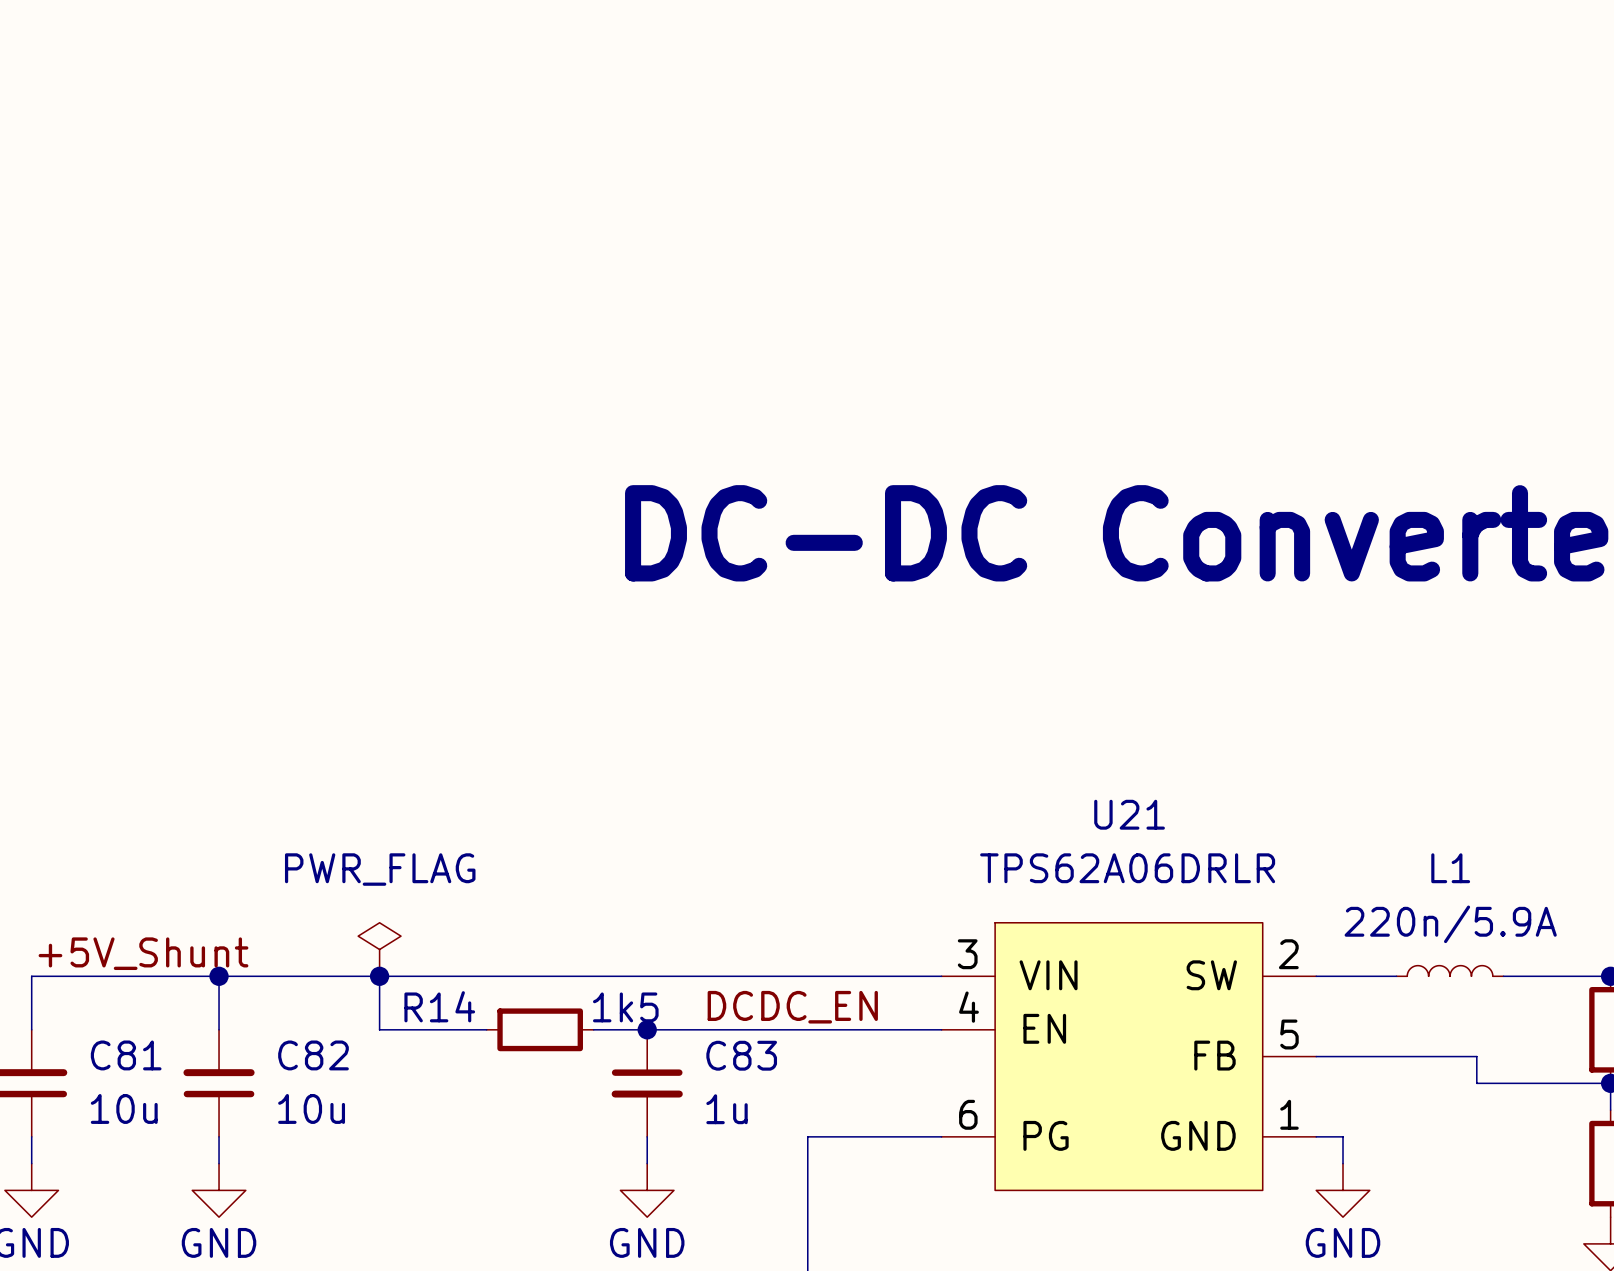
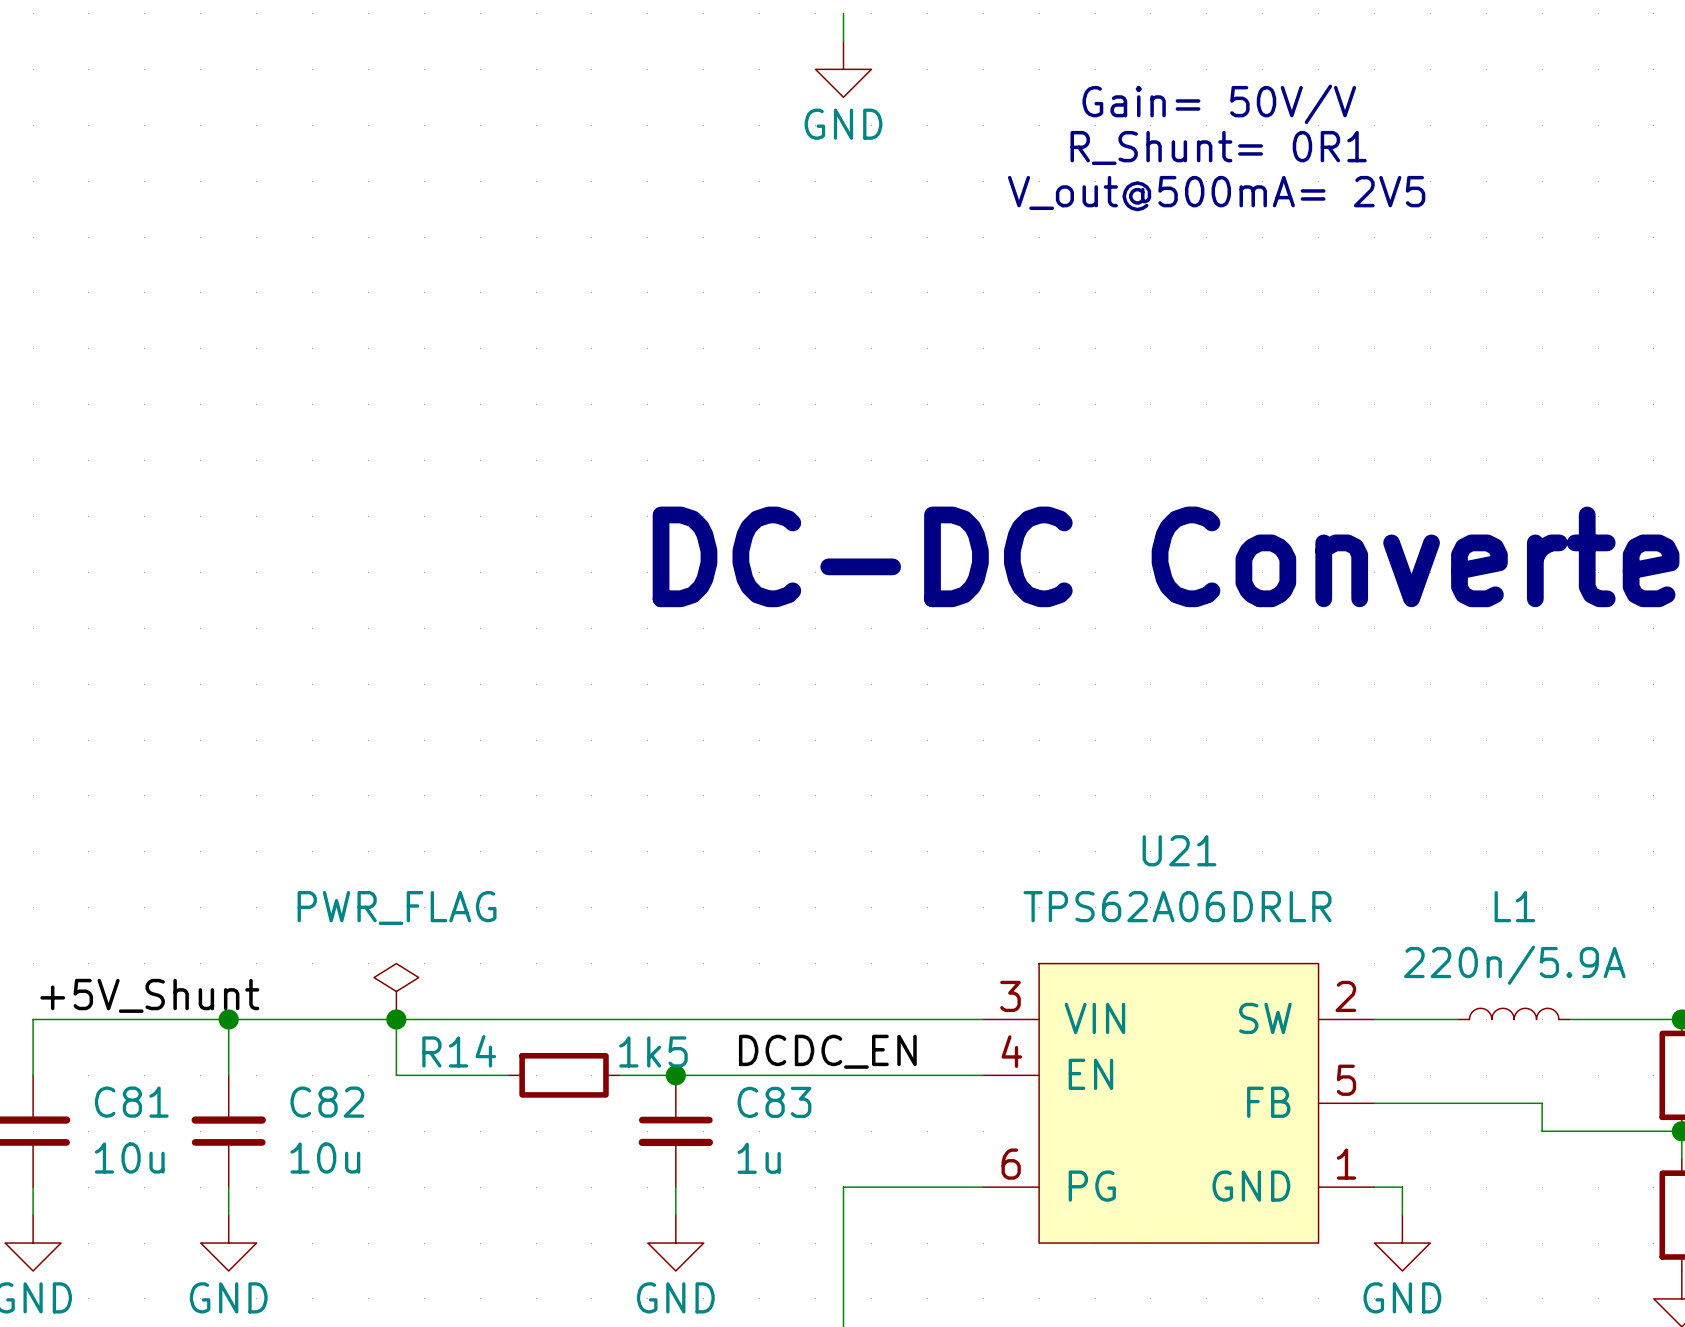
wire: none -> (843, 13) (843, 41)
power symbol: none -> GND (843, 69)
text: none -> Gain= 50V/V (1219, 104)
text: none -> R_Shunt= 0R1 (1218, 147)
text: none -> V_out@500mA= 2V5 (1216, 193)

